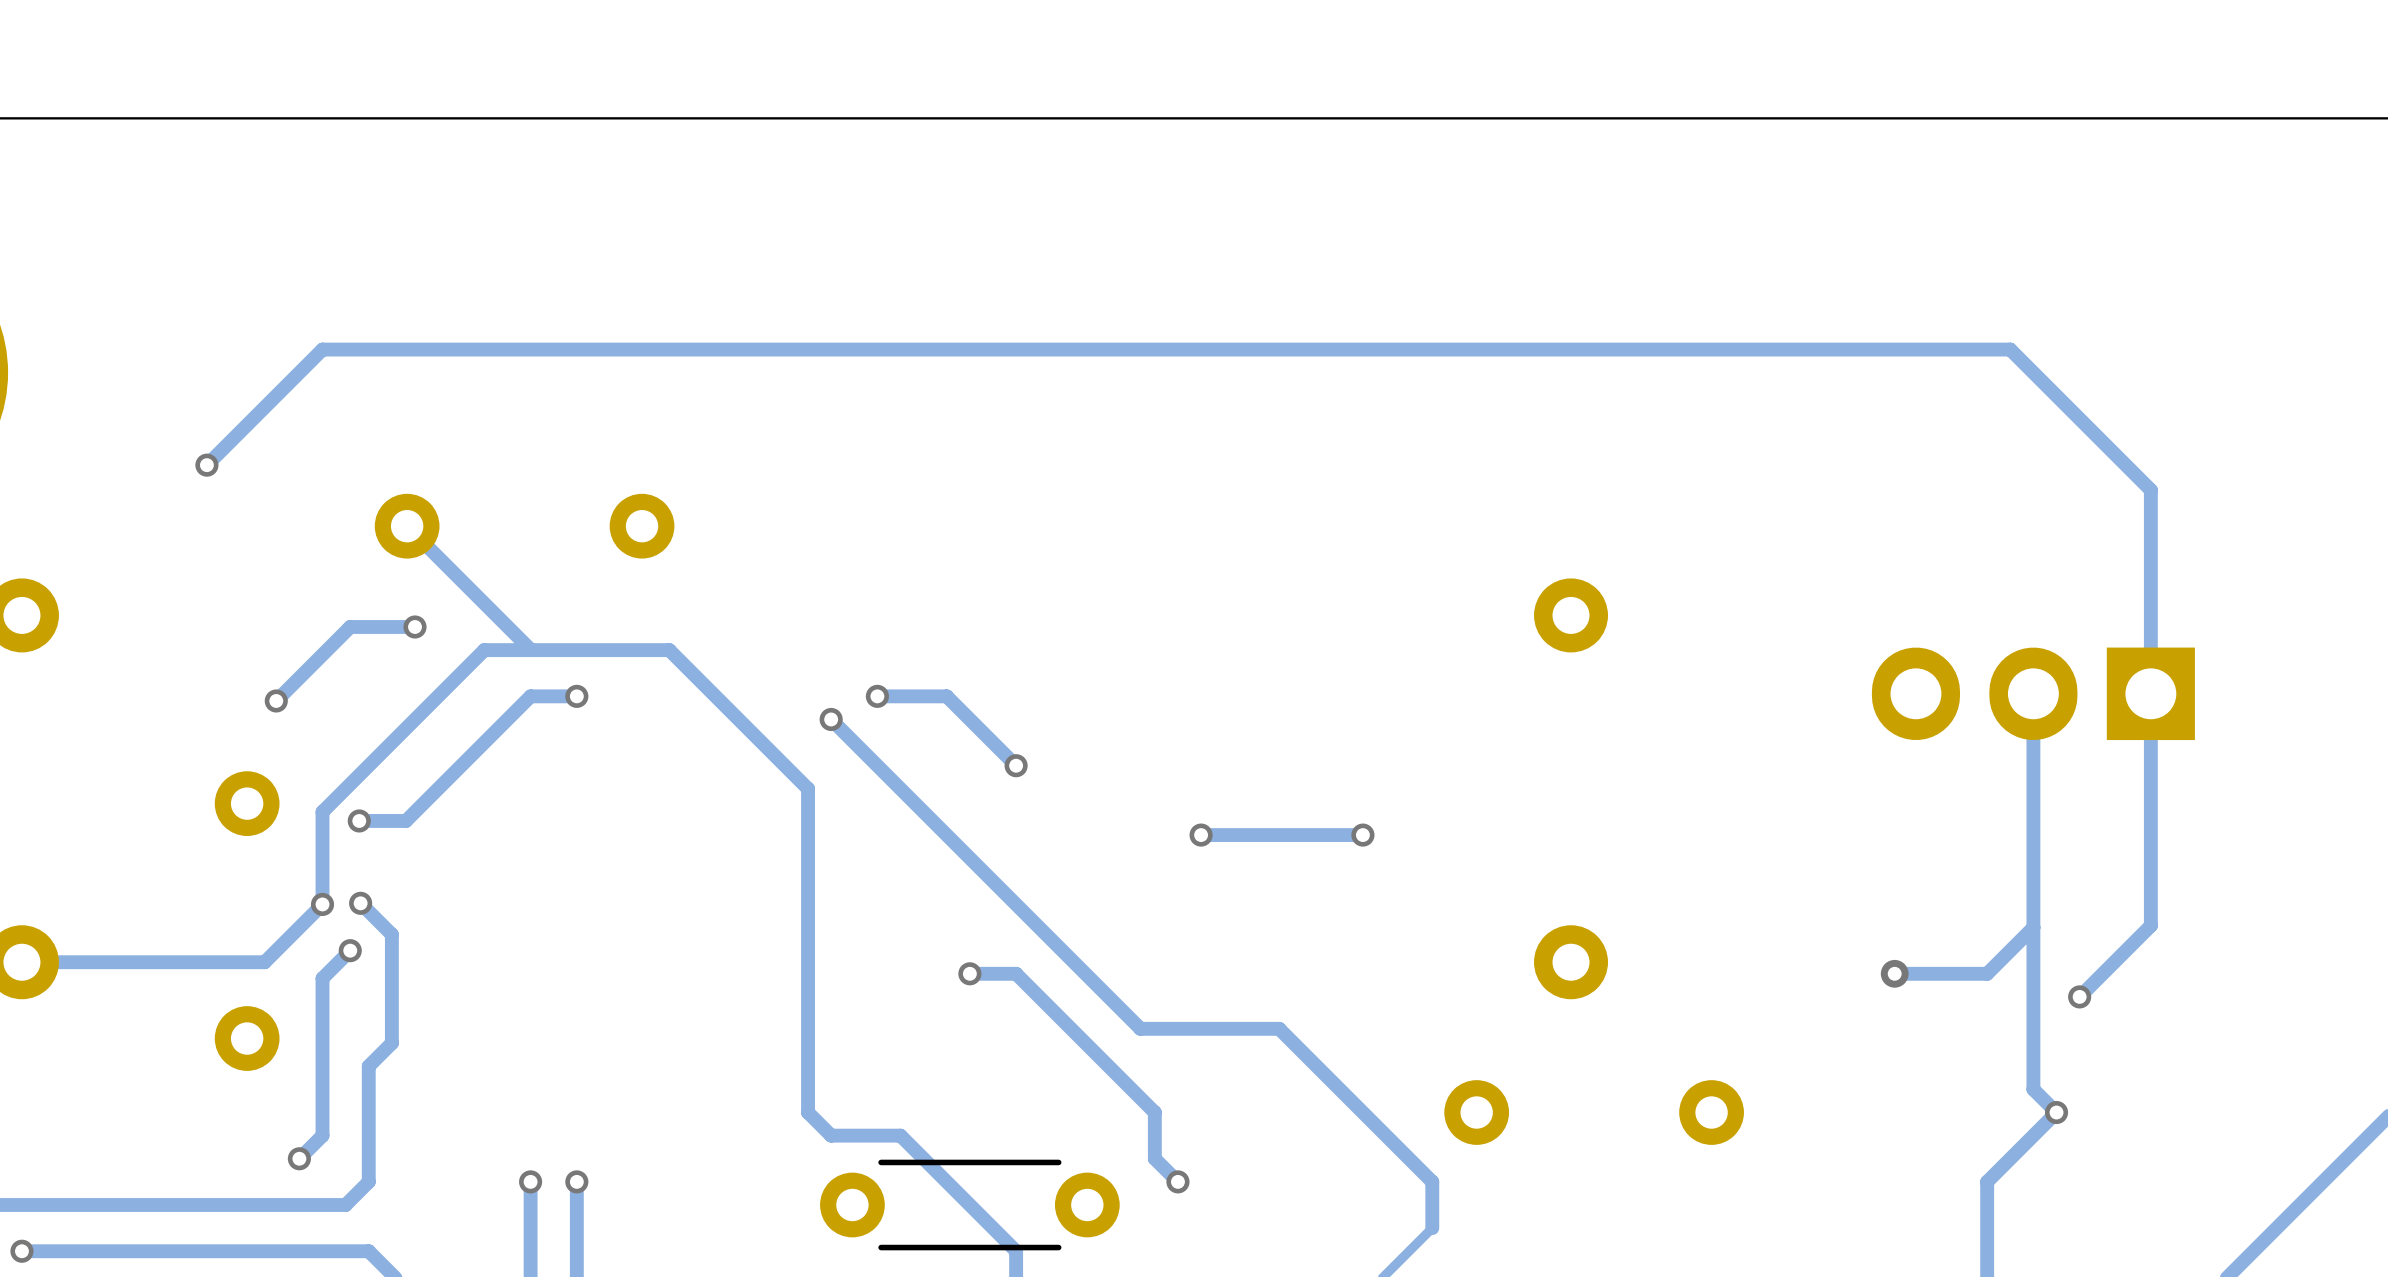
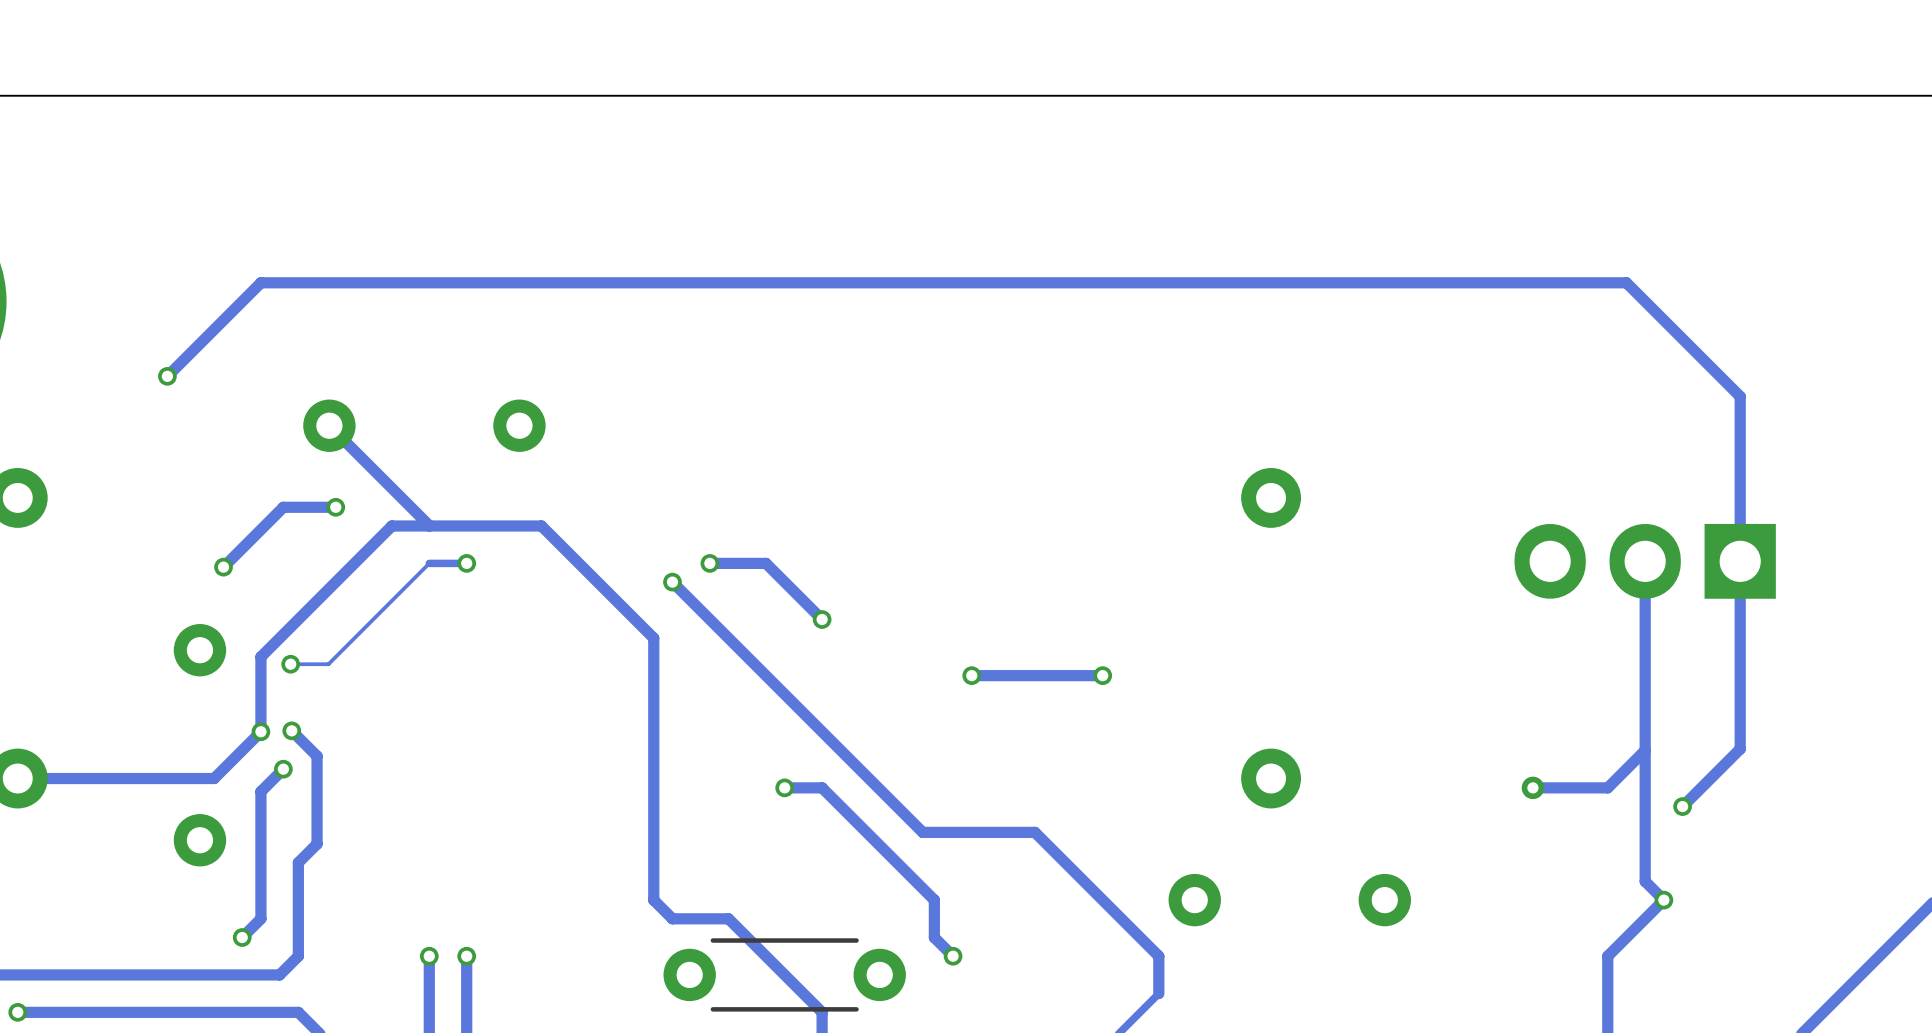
track width: thick (576, 696) (530, 696) (405, 820) (359, 820) -> thin (466, 563) (429, 563) (328, 664) (290, 664)

